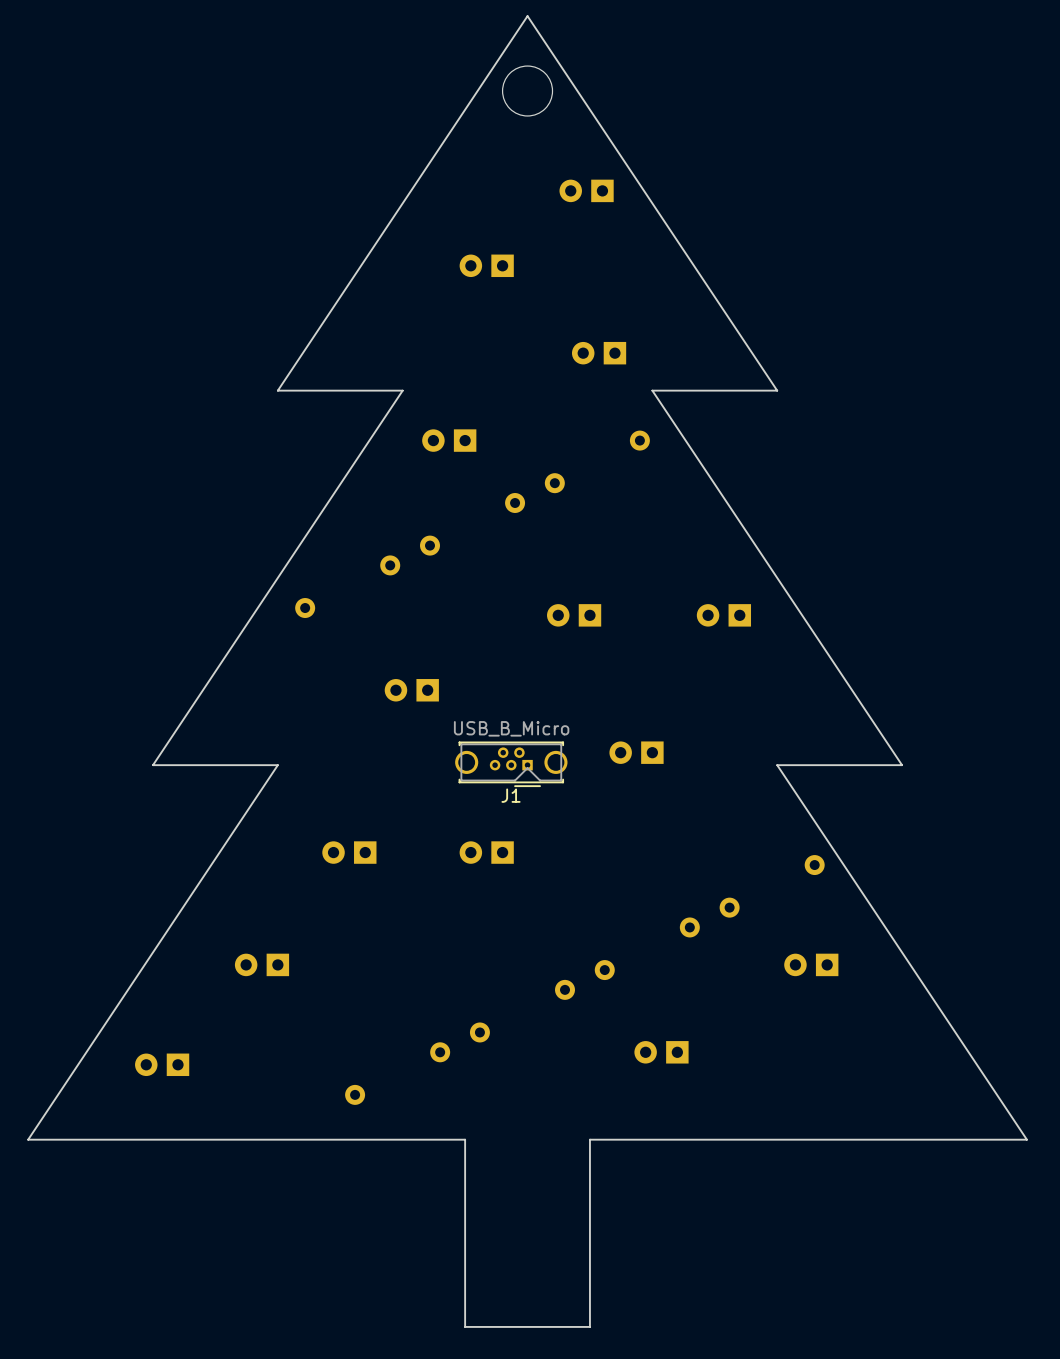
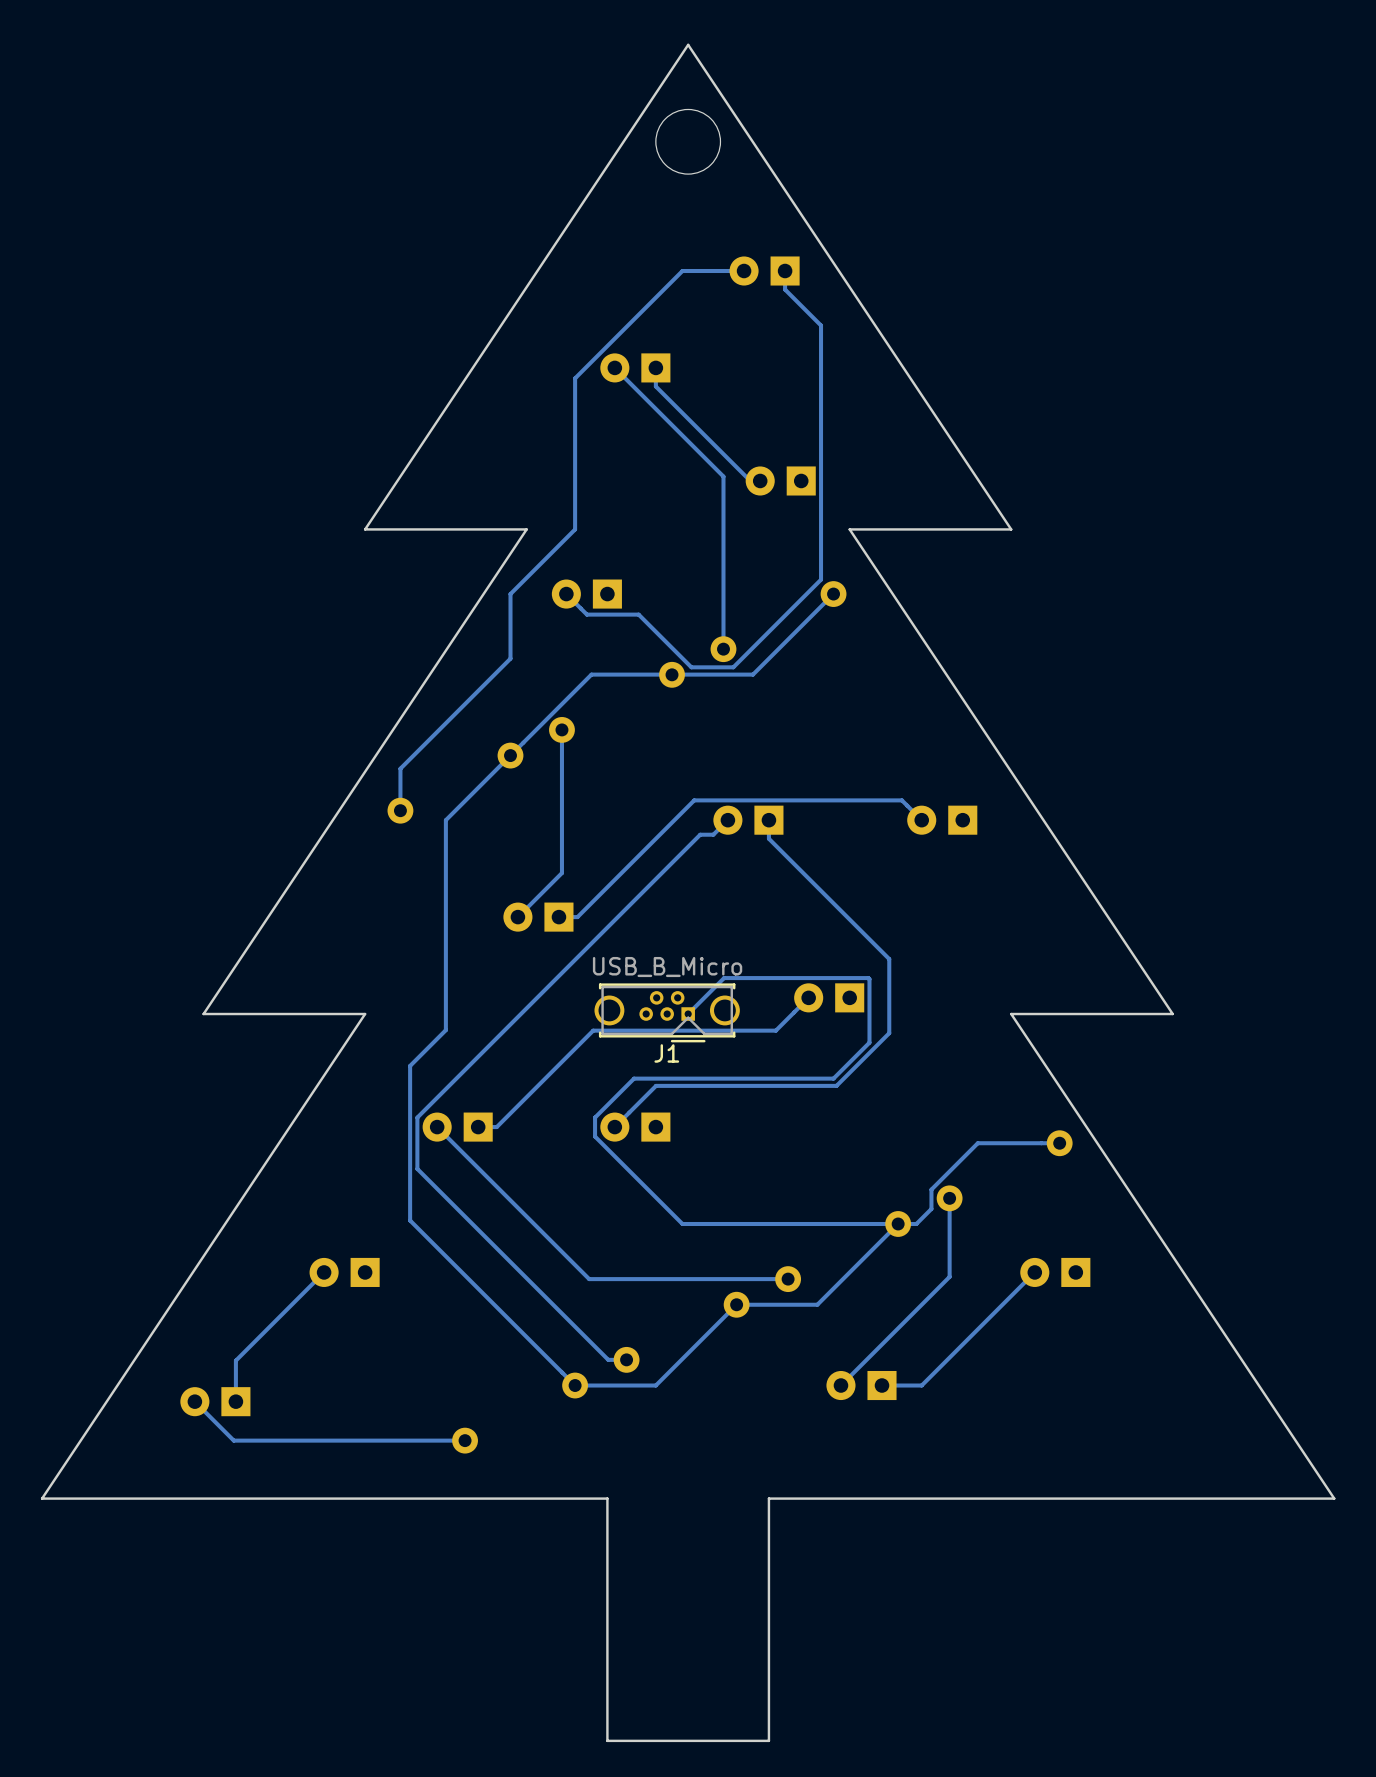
track: none -> (744, 271) (682, 271) (575, 378) (575, 529) (510, 594) (510, 658) (400, 768) (400, 810)
track: none -> (785, 271) (785, 289) (821, 325) (821, 579) (733, 667) (691, 667) (638, 614) (586, 614) (566, 594)
track: none -> (614, 367) (723, 476) (723, 649)
track: none -> (655, 367) (655, 386) (750, 480) (760, 480)
track: none -> (833, 594) (752, 674) (591, 674) (445, 820) (445, 1030) (410, 1065) (410, 1220) (575, 1385) (655, 1385) (736, 1304) (817, 1304) (898, 1223)
track: none -> (561, 729) (561, 873) (517, 917)
track: none -> (727, 820) (713, 834) (700, 834) (417, 1117) (417, 1168) (608, 1359) (626, 1359)
track: none -> (768, 820) (768, 838) (889, 959) (889, 1033) (836, 1085) (656, 1085) (614, 1127)
track: none -> (921, 820) (901, 800) (694, 800) (577, 917) (558, 917)
track: none -> (808, 997) (775, 1030) (593, 1030) (496, 1127) (478, 1127)
track: none -> (688, 1014) (724, 978) (869, 979) (869, 1042) (833, 1078) (634, 1078) (595, 1117) (595, 1136) (682, 1223) (916, 1223) (931, 1208) (931, 1189) (977, 1143) (1059, 1143)
track: none -> (437, 1127) (589, 1279) (788, 1279)
track: none -> (949, 1198) (949, 1276) (840, 1385)
track: none -> (324, 1272) (235, 1360) (235, 1401)
track: none -> (1034, 1272) (921, 1385) (882, 1385)
track: none -> (194, 1401) (233, 1440) (465, 1440)

